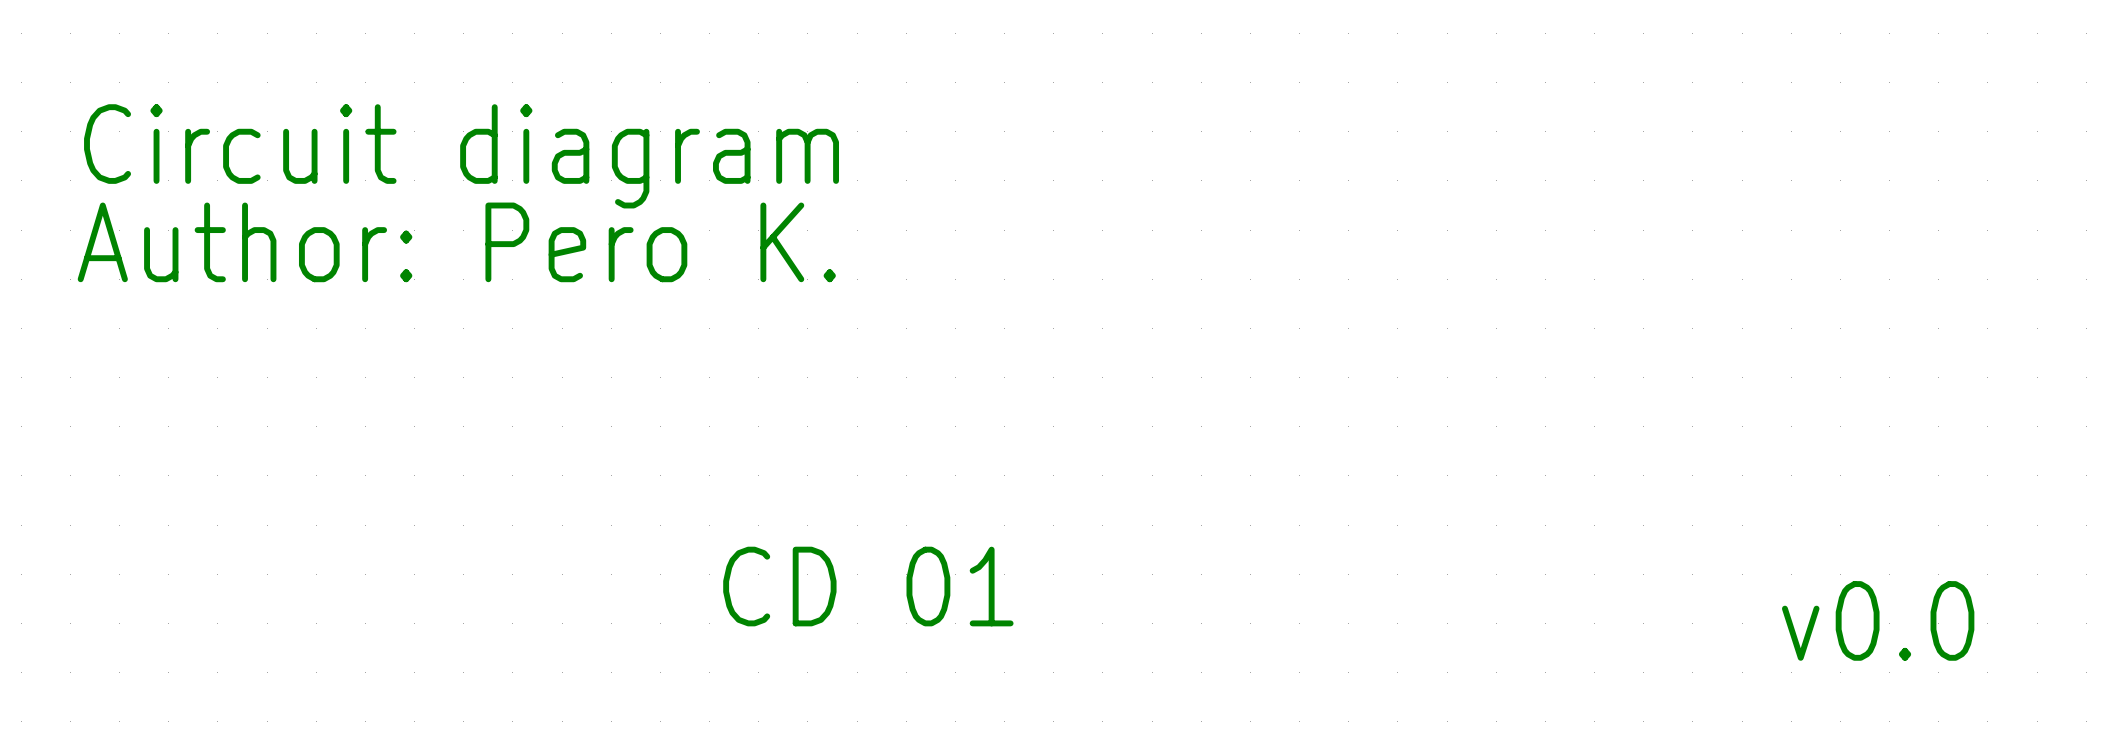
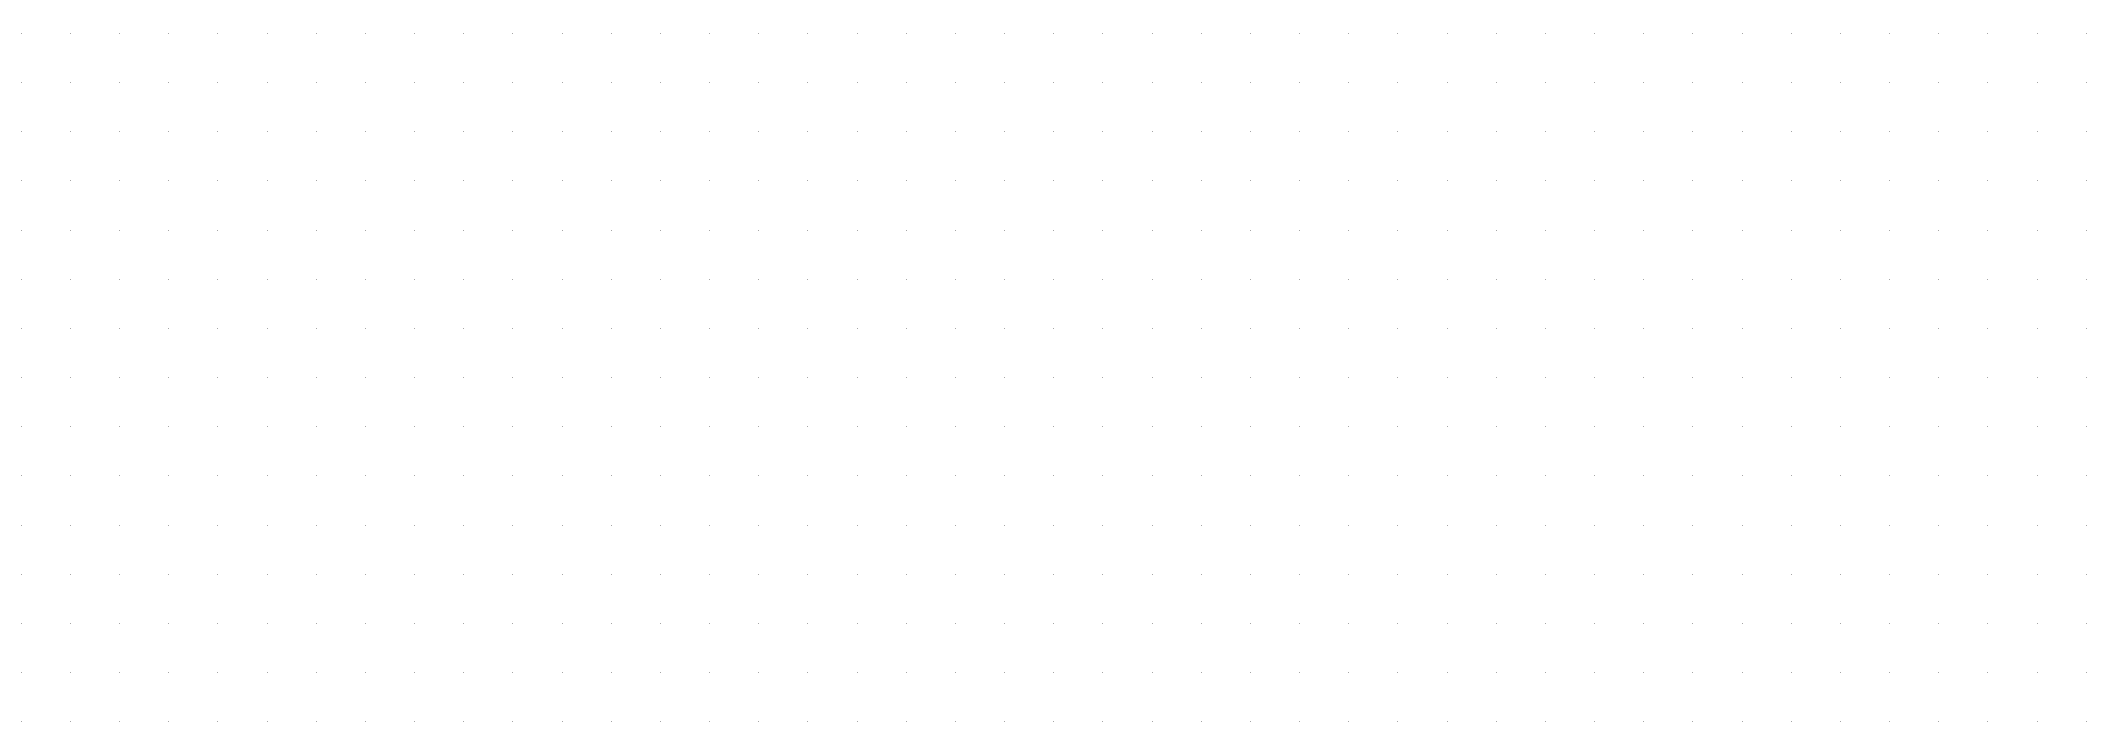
text: Circuit diagram (461, 156) -> none
text: Author: Pero K. (456, 242) -> none
text: CD 01 (868, 586) -> none
text: v0.0 (1878, 620) -> none

